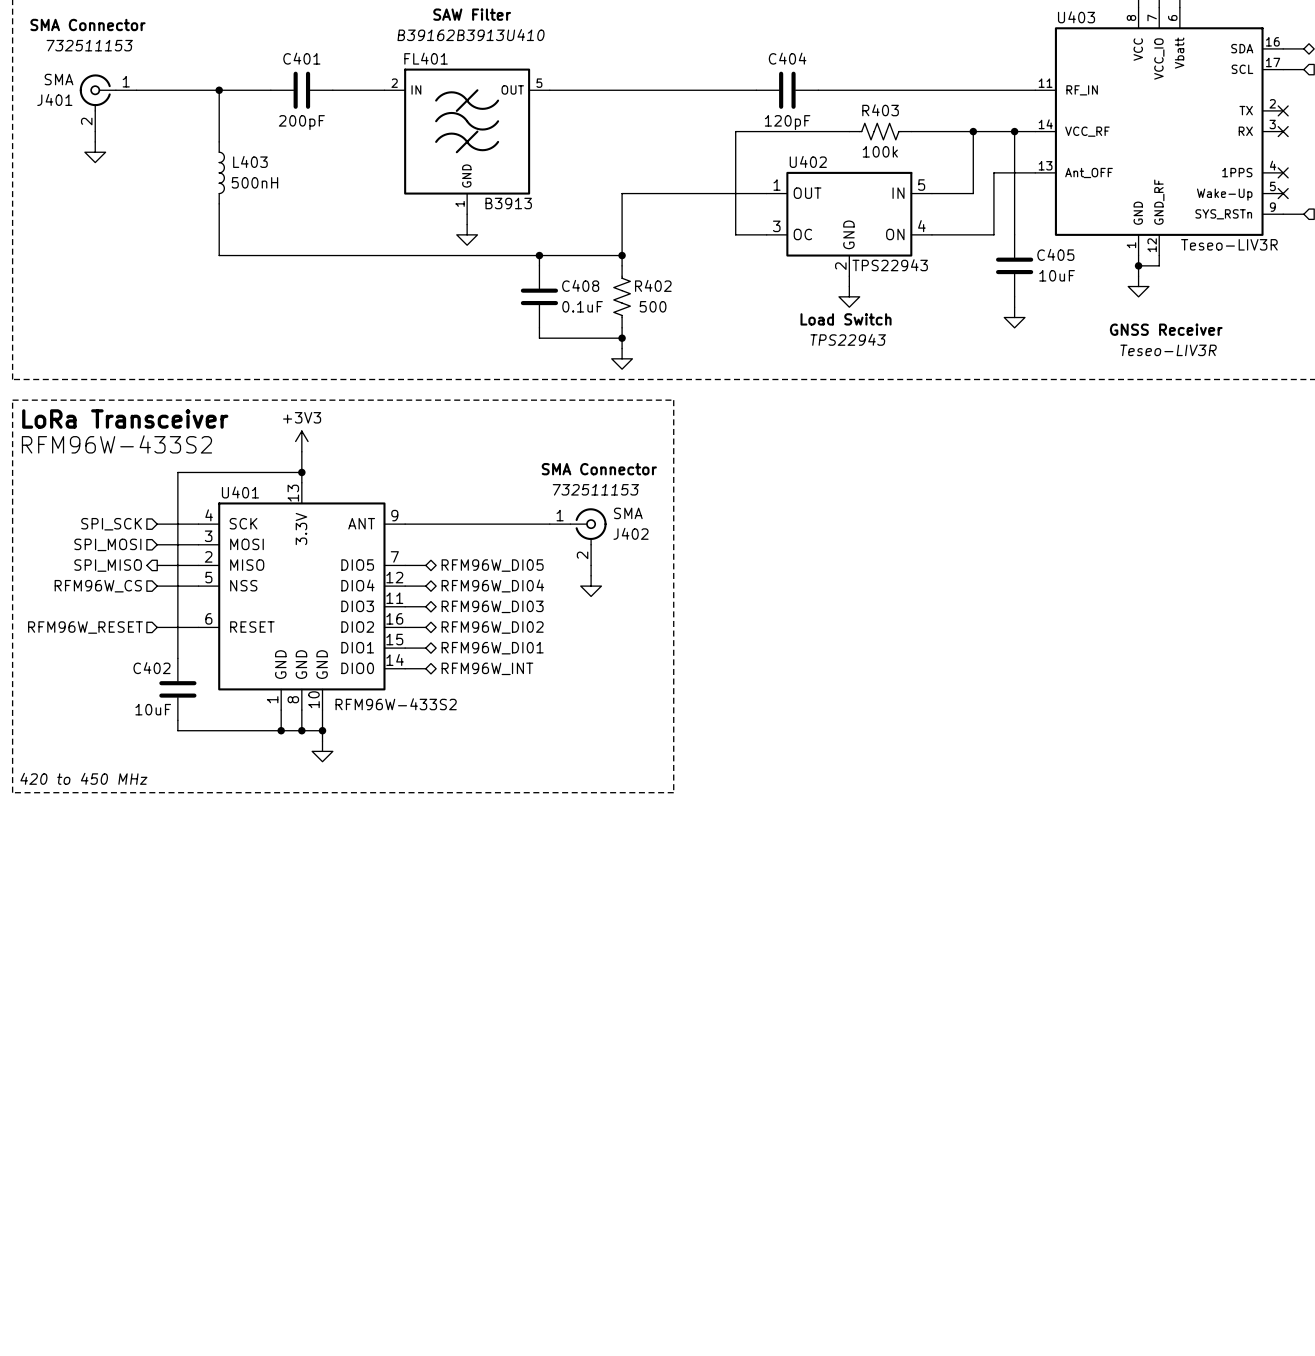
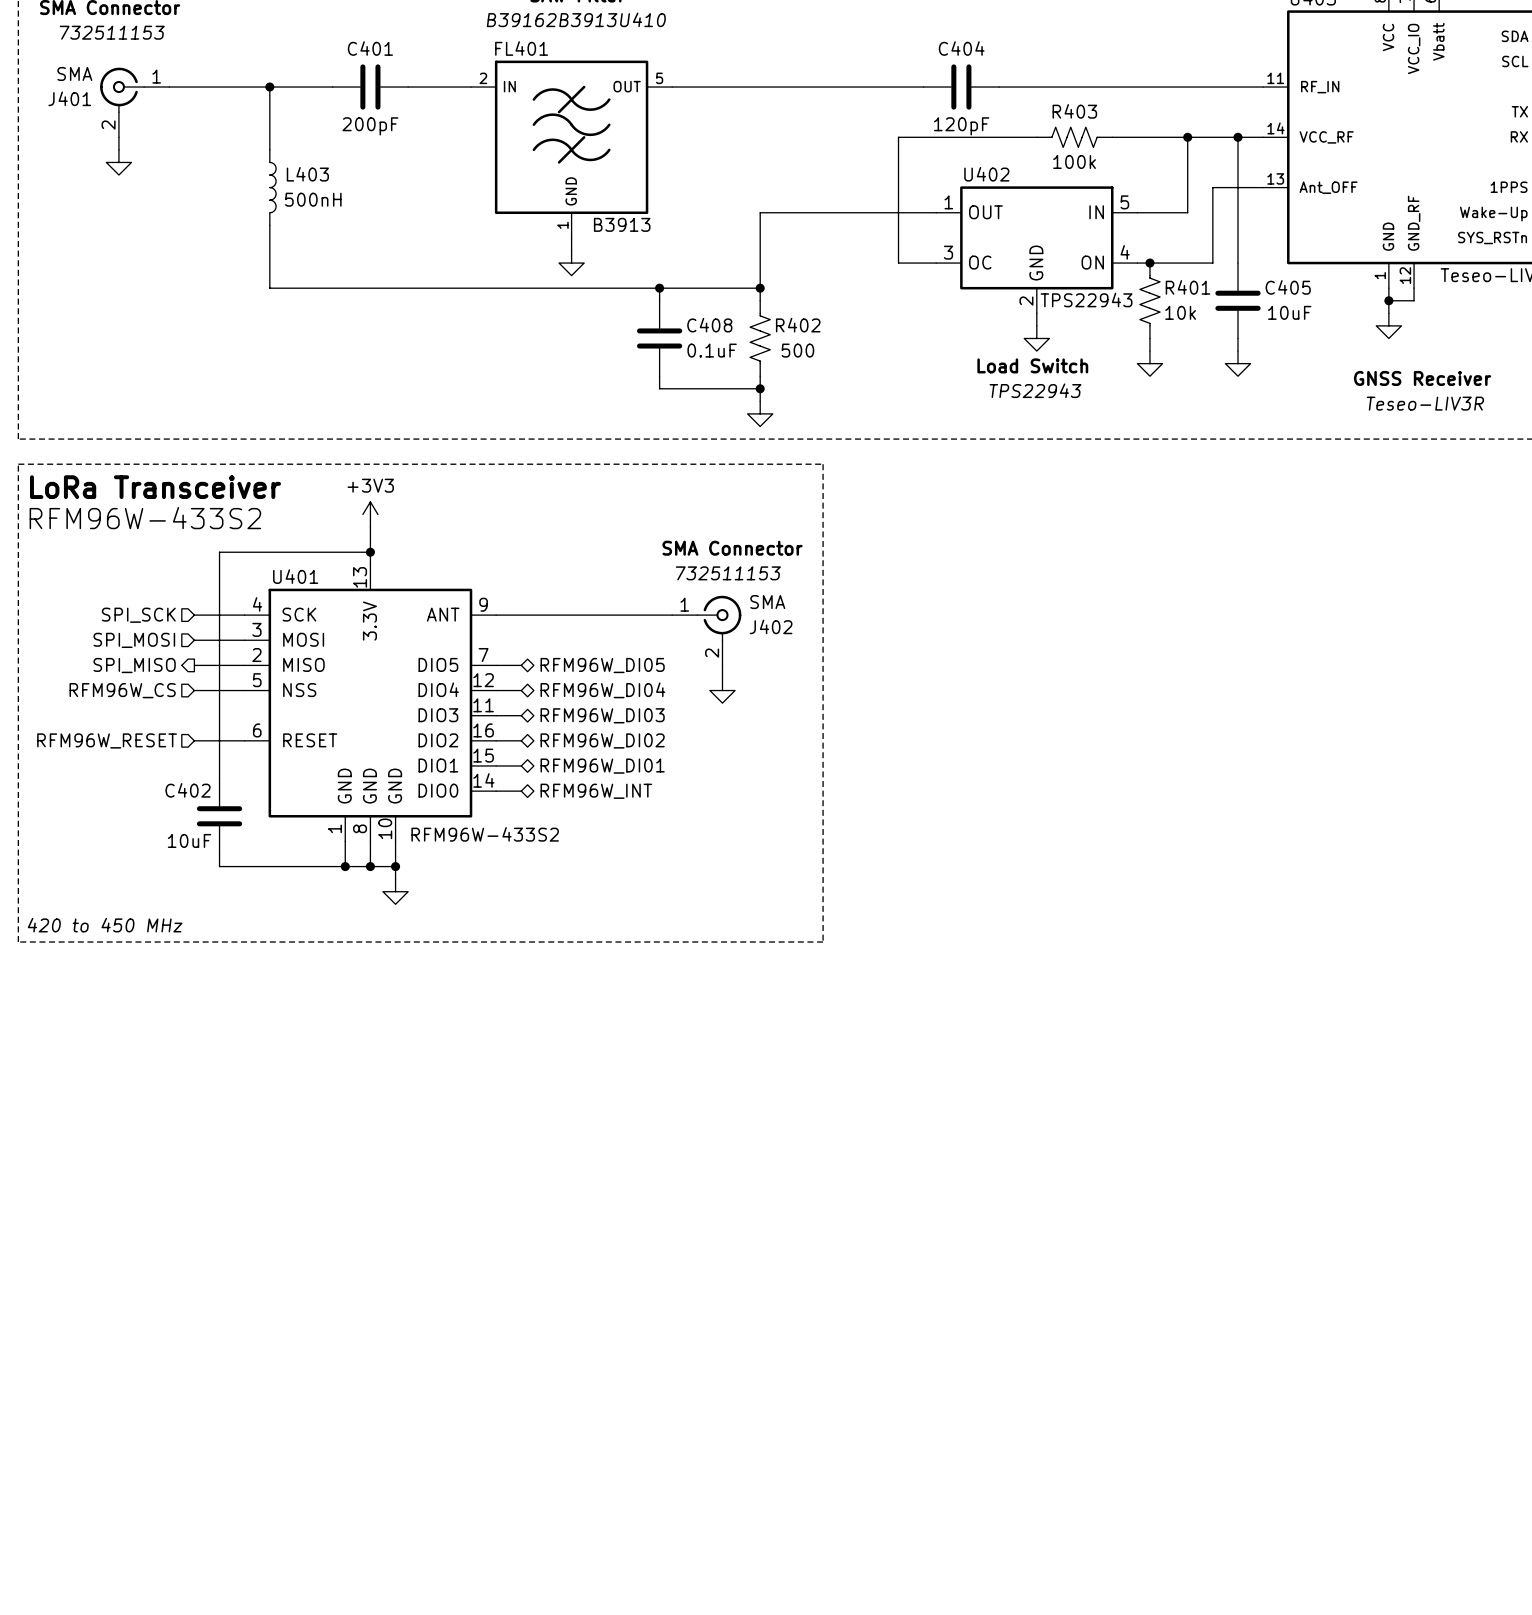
junction: none -> (1149, 263)
R401: none -> 10k (1149, 300)
wire: none -> (1149, 338) (1149, 351)
power symbol: none -> (1149, 363)

